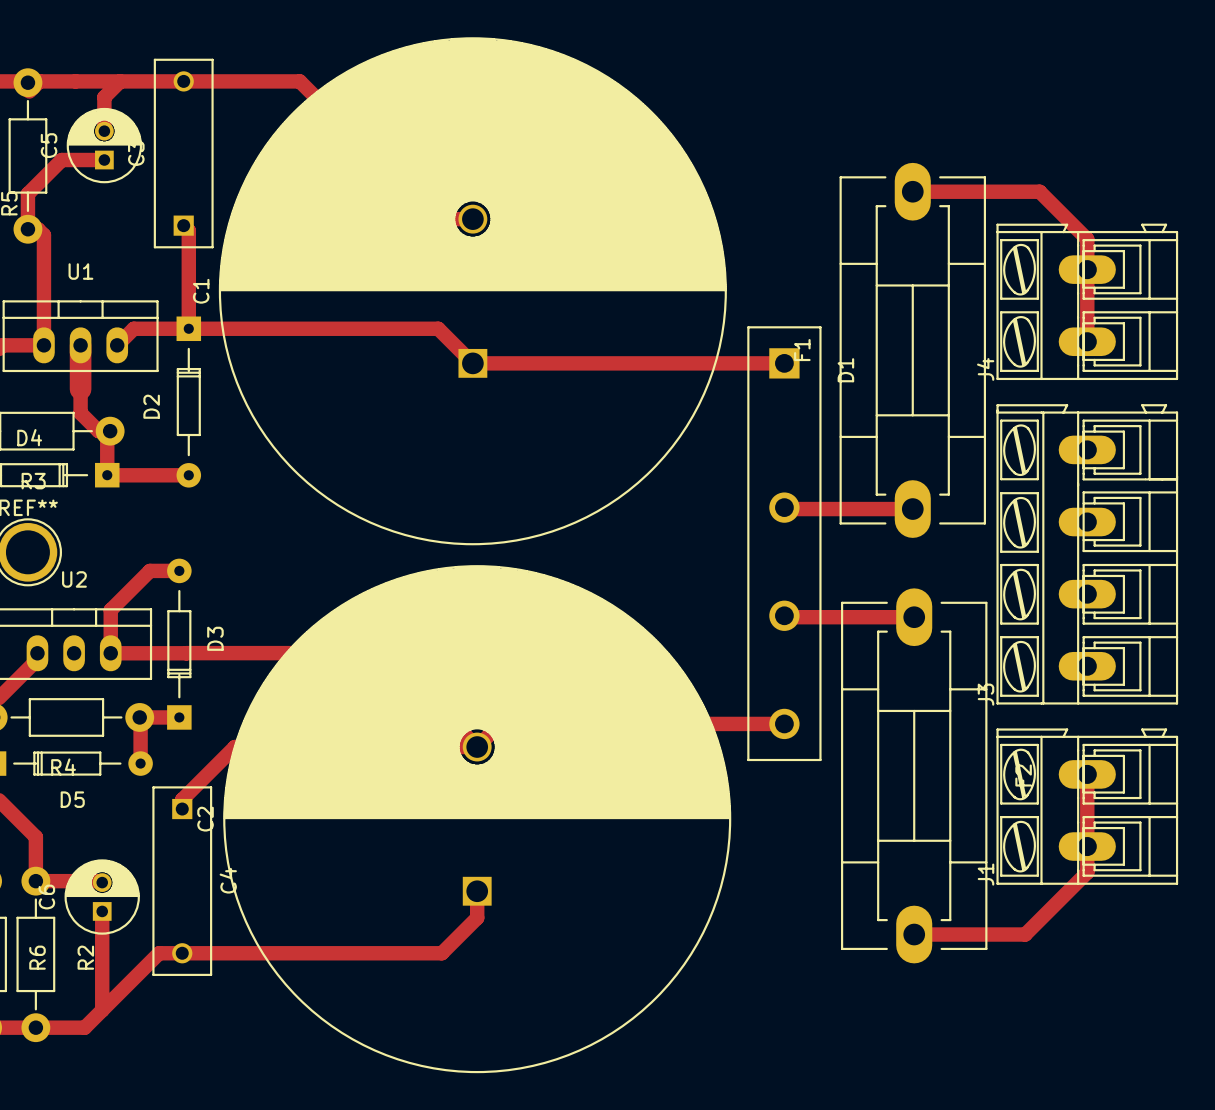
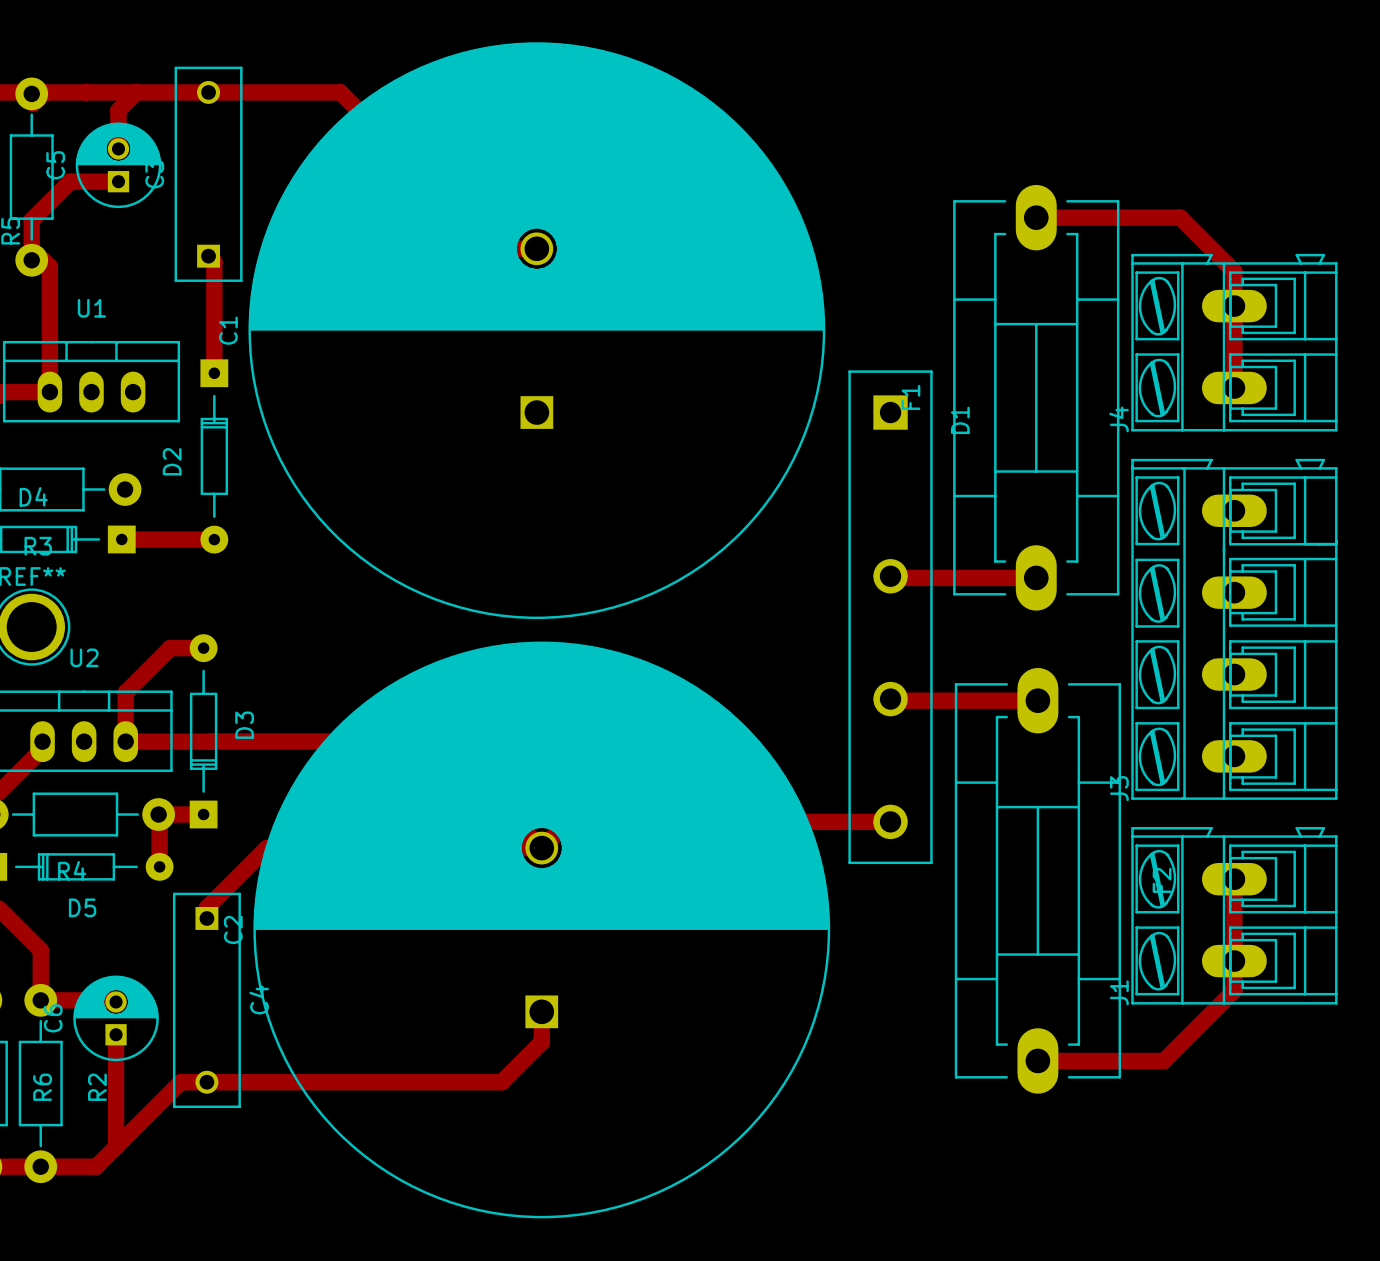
track: (80, 345) (80, 413) (98, 431) (110, 431) (107, 434) (107, 475) -> none
track: (117, 345) (133, 328) (438, 328) (472, 363) (784, 363) -> none

